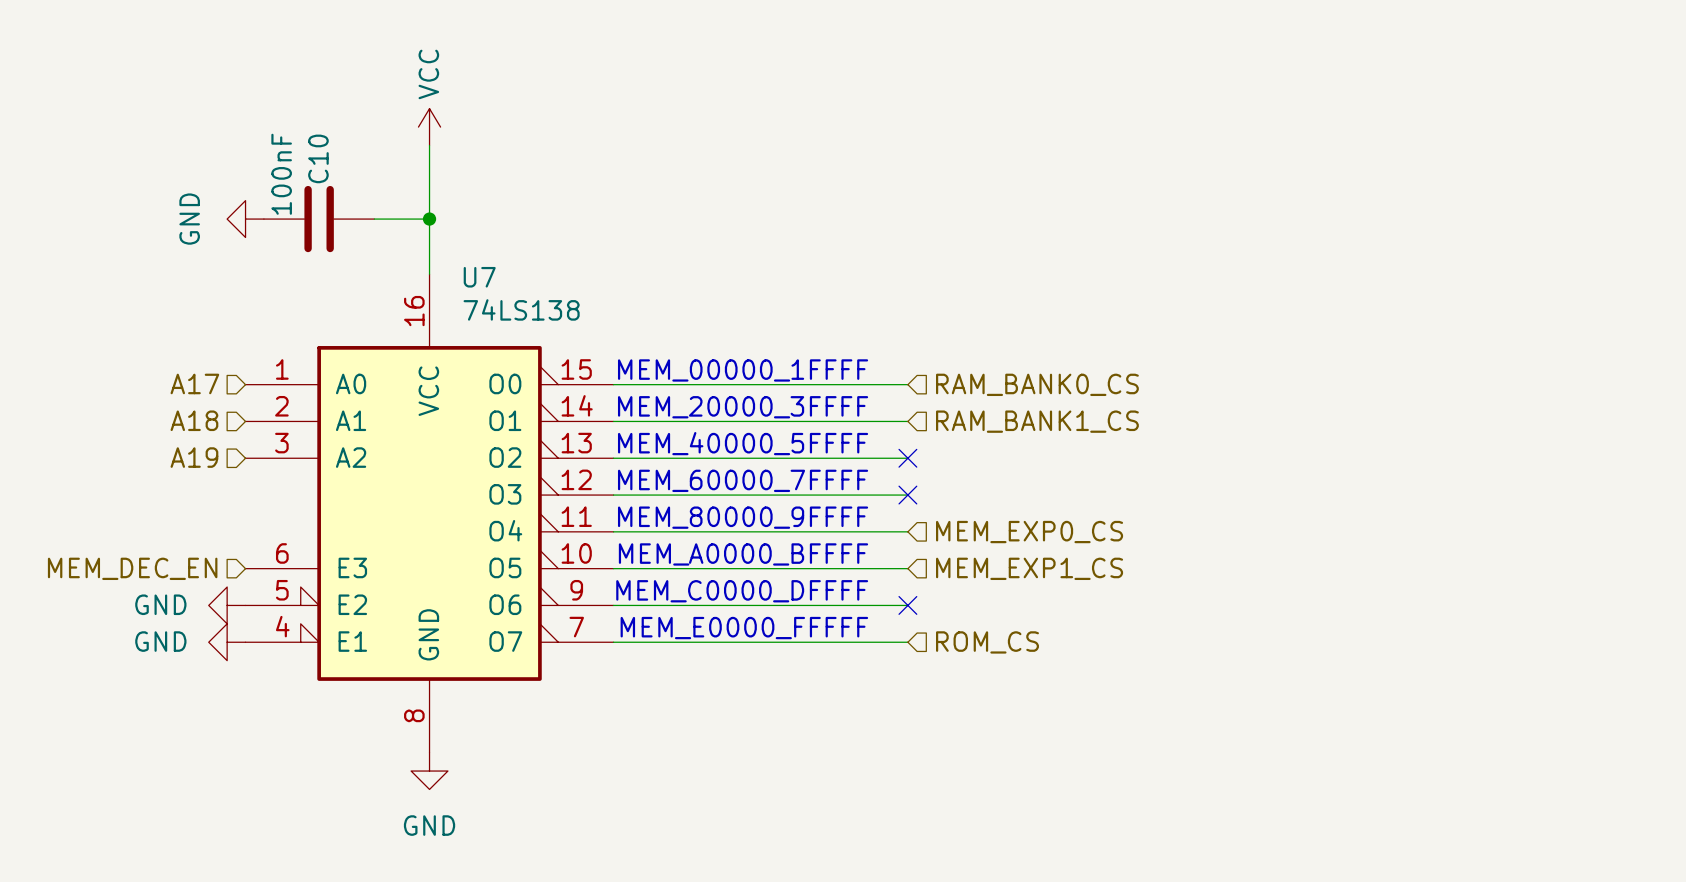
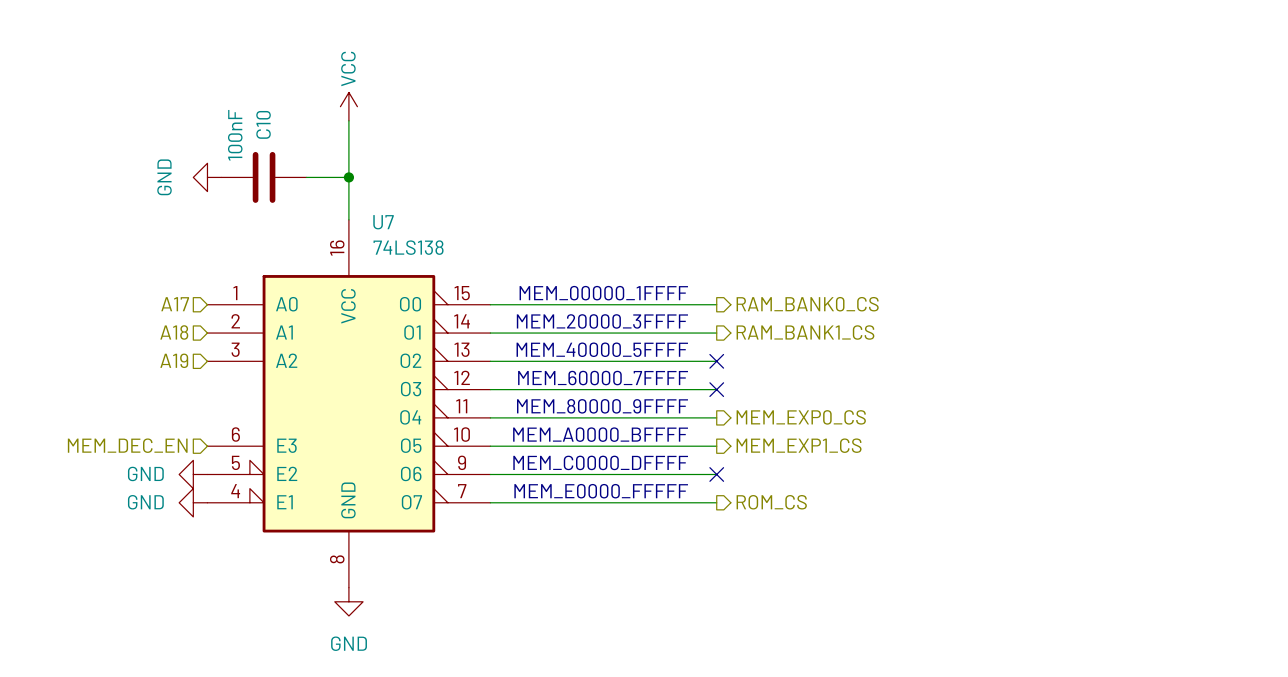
hierarchical label shape: input (1037, 384) -> output (807, 304)
hierarchical label shape: input (1037, 421) -> output (805, 332)
hierarchical label shape: input (1029, 532) -> output (801, 417)
hierarchical label shape: input (1029, 568) -> output (799, 445)
hierarchical label shape: input (987, 642) -> output (771, 502)

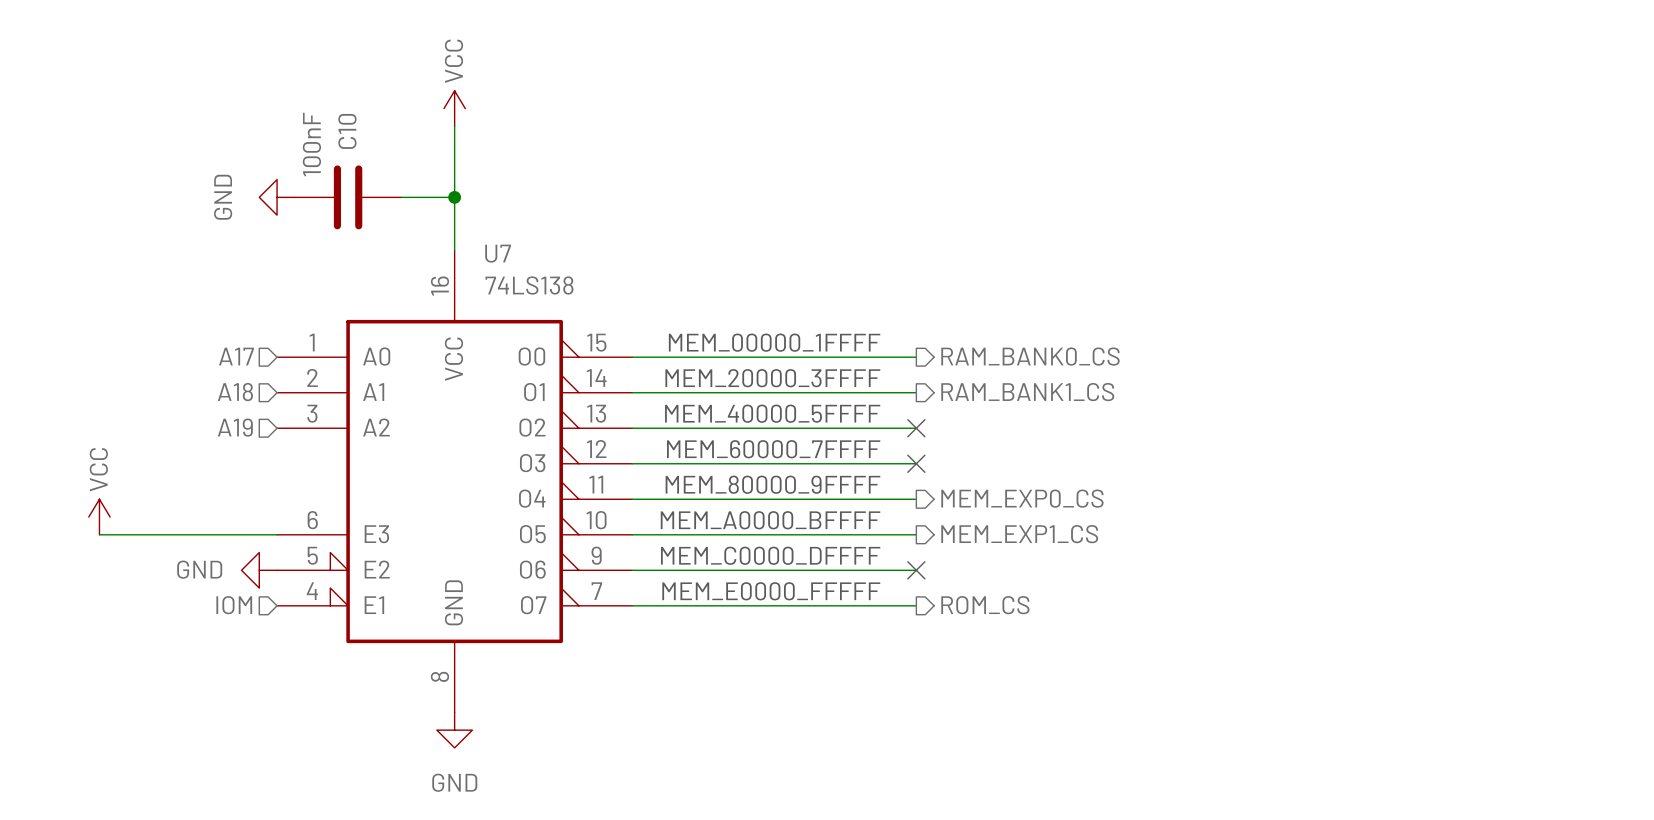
power symbol: none -> VCC (99, 517)
hierarchical label: MEM_DEC_EN (127, 445) -> none
wire: none -> (99, 534) (277, 534)
hierarchical label: none -> IOM (234, 605)
power symbol: GND (193, 502) -> none

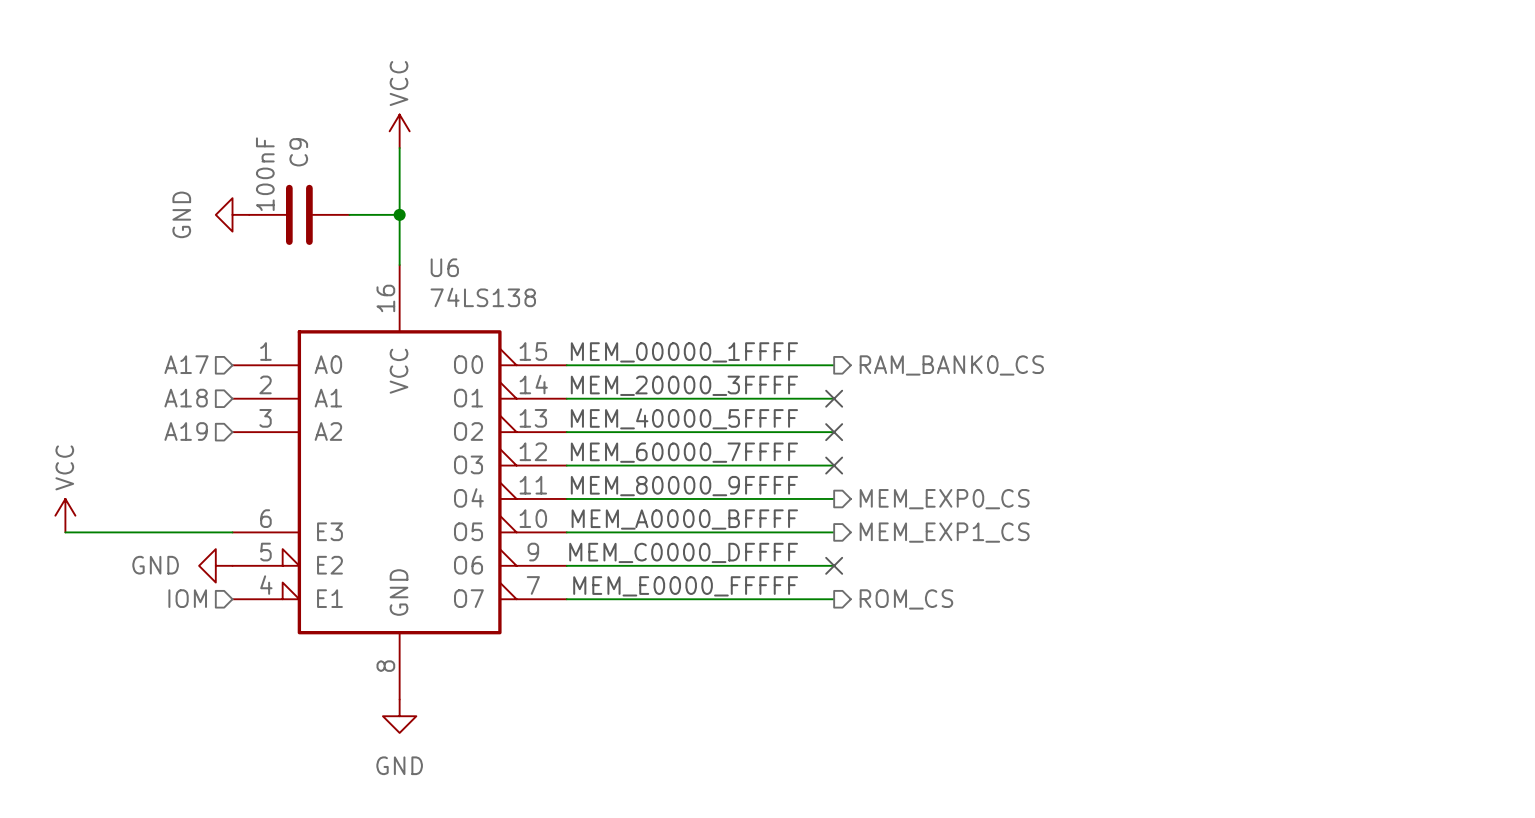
C10 name: C10 (347, 131) -> C9 (298, 152)
U7 name: U7 (498, 253) -> U6 (444, 267)
no-connect mark: none -> (834, 398)
hierarchical label: RAM_BANK1_CS (1027, 392) -> none

